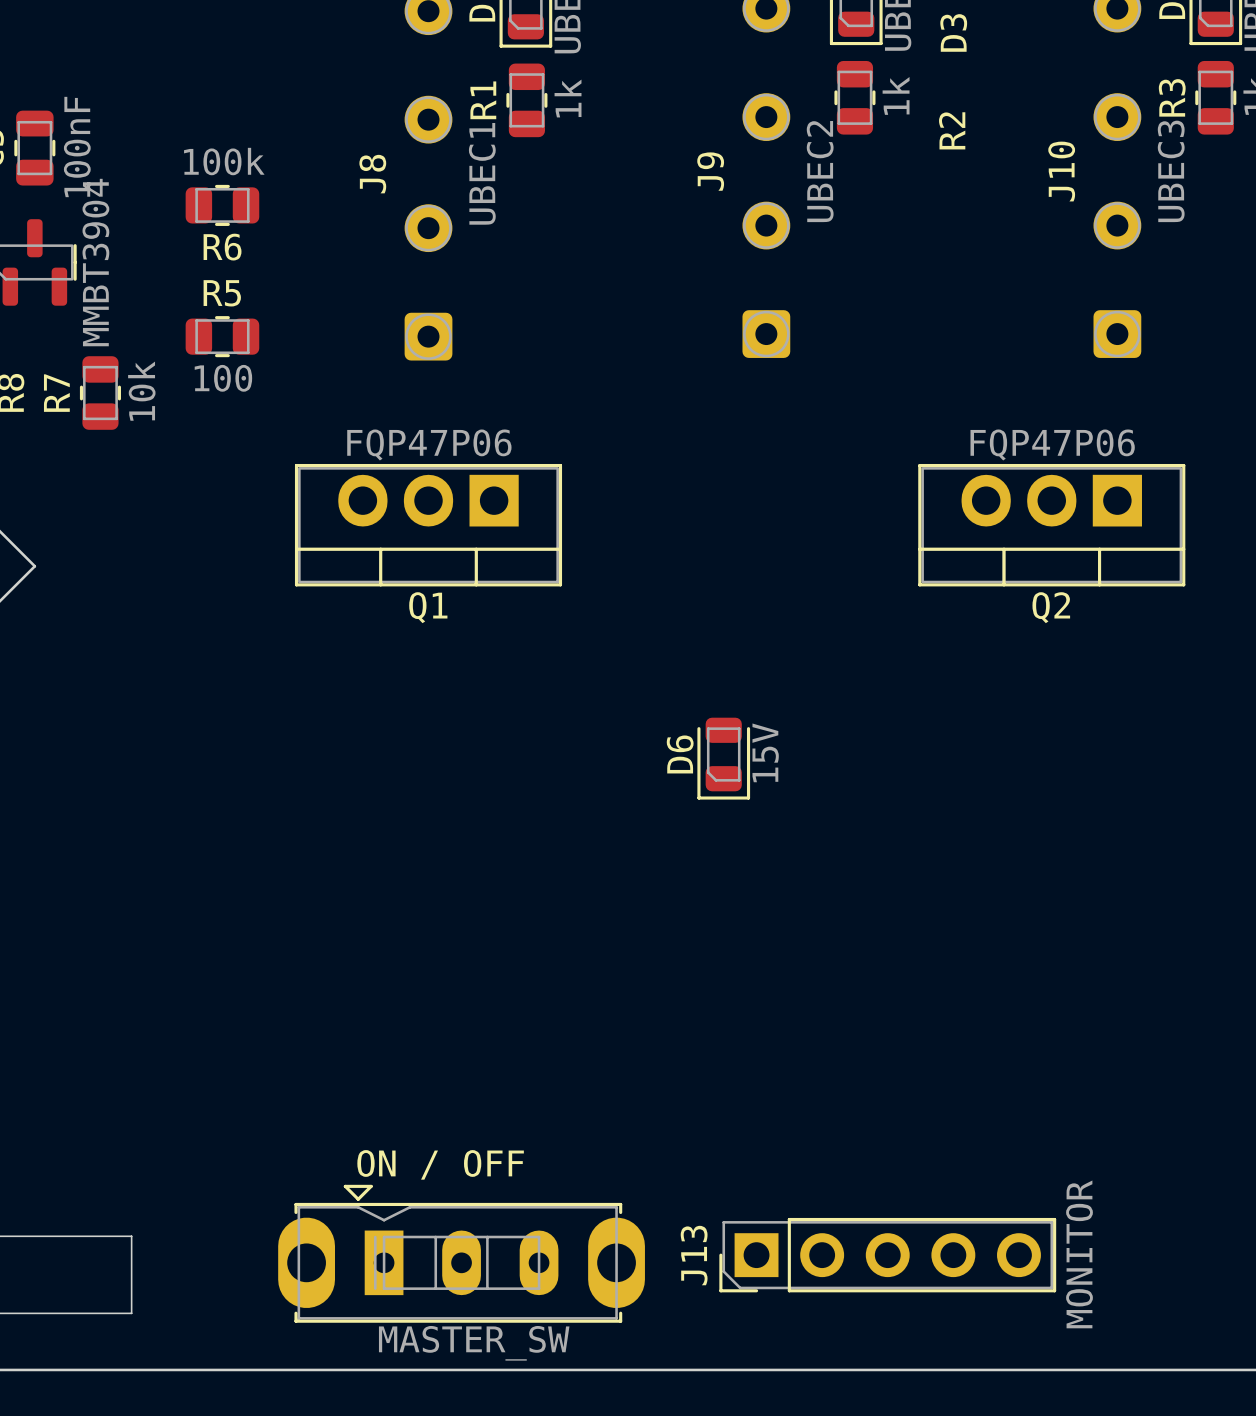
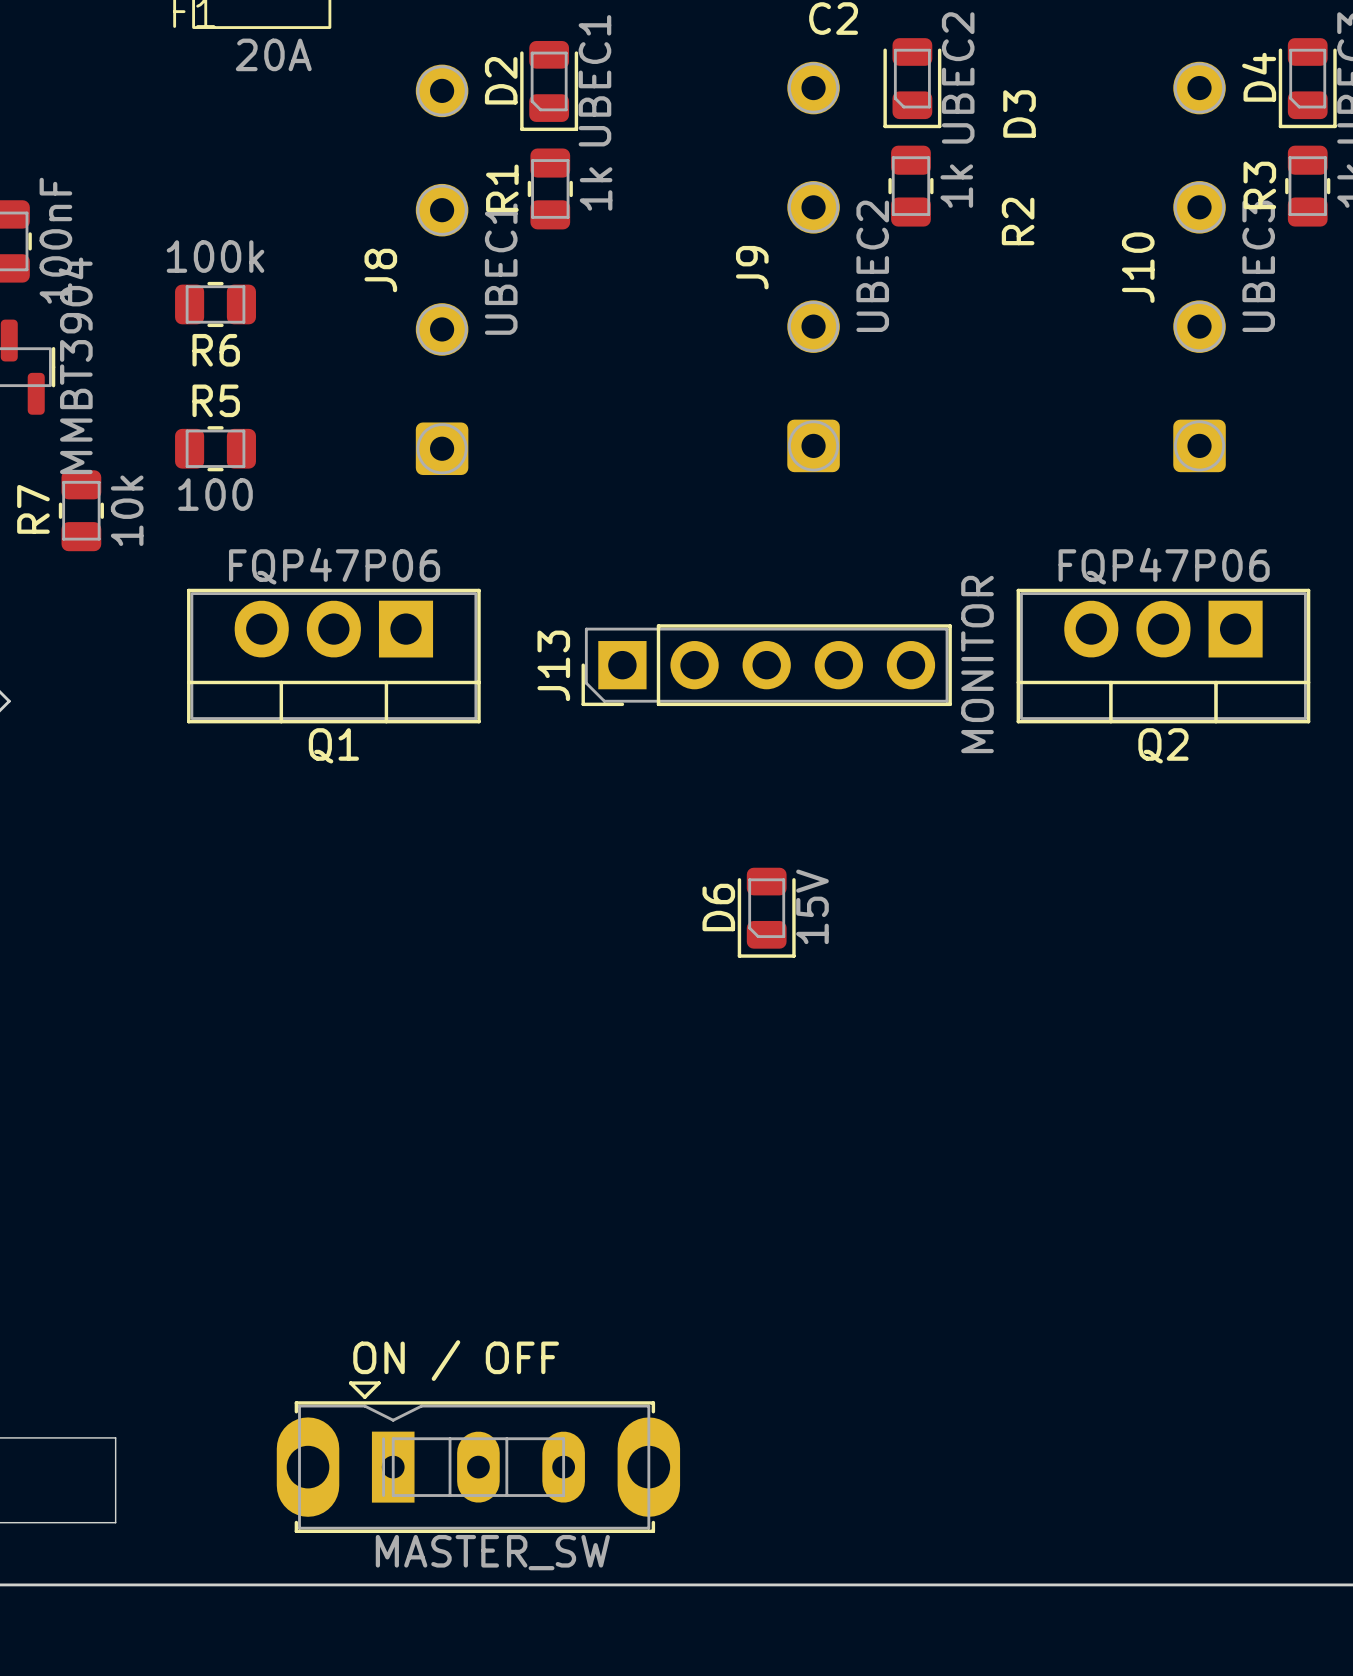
Q1 position: (428, 525) -> (333, 656)
Q2 position: (1051, 525) -> (1163, 656)
J13 position: (887, 1255) -> (766, 665)

